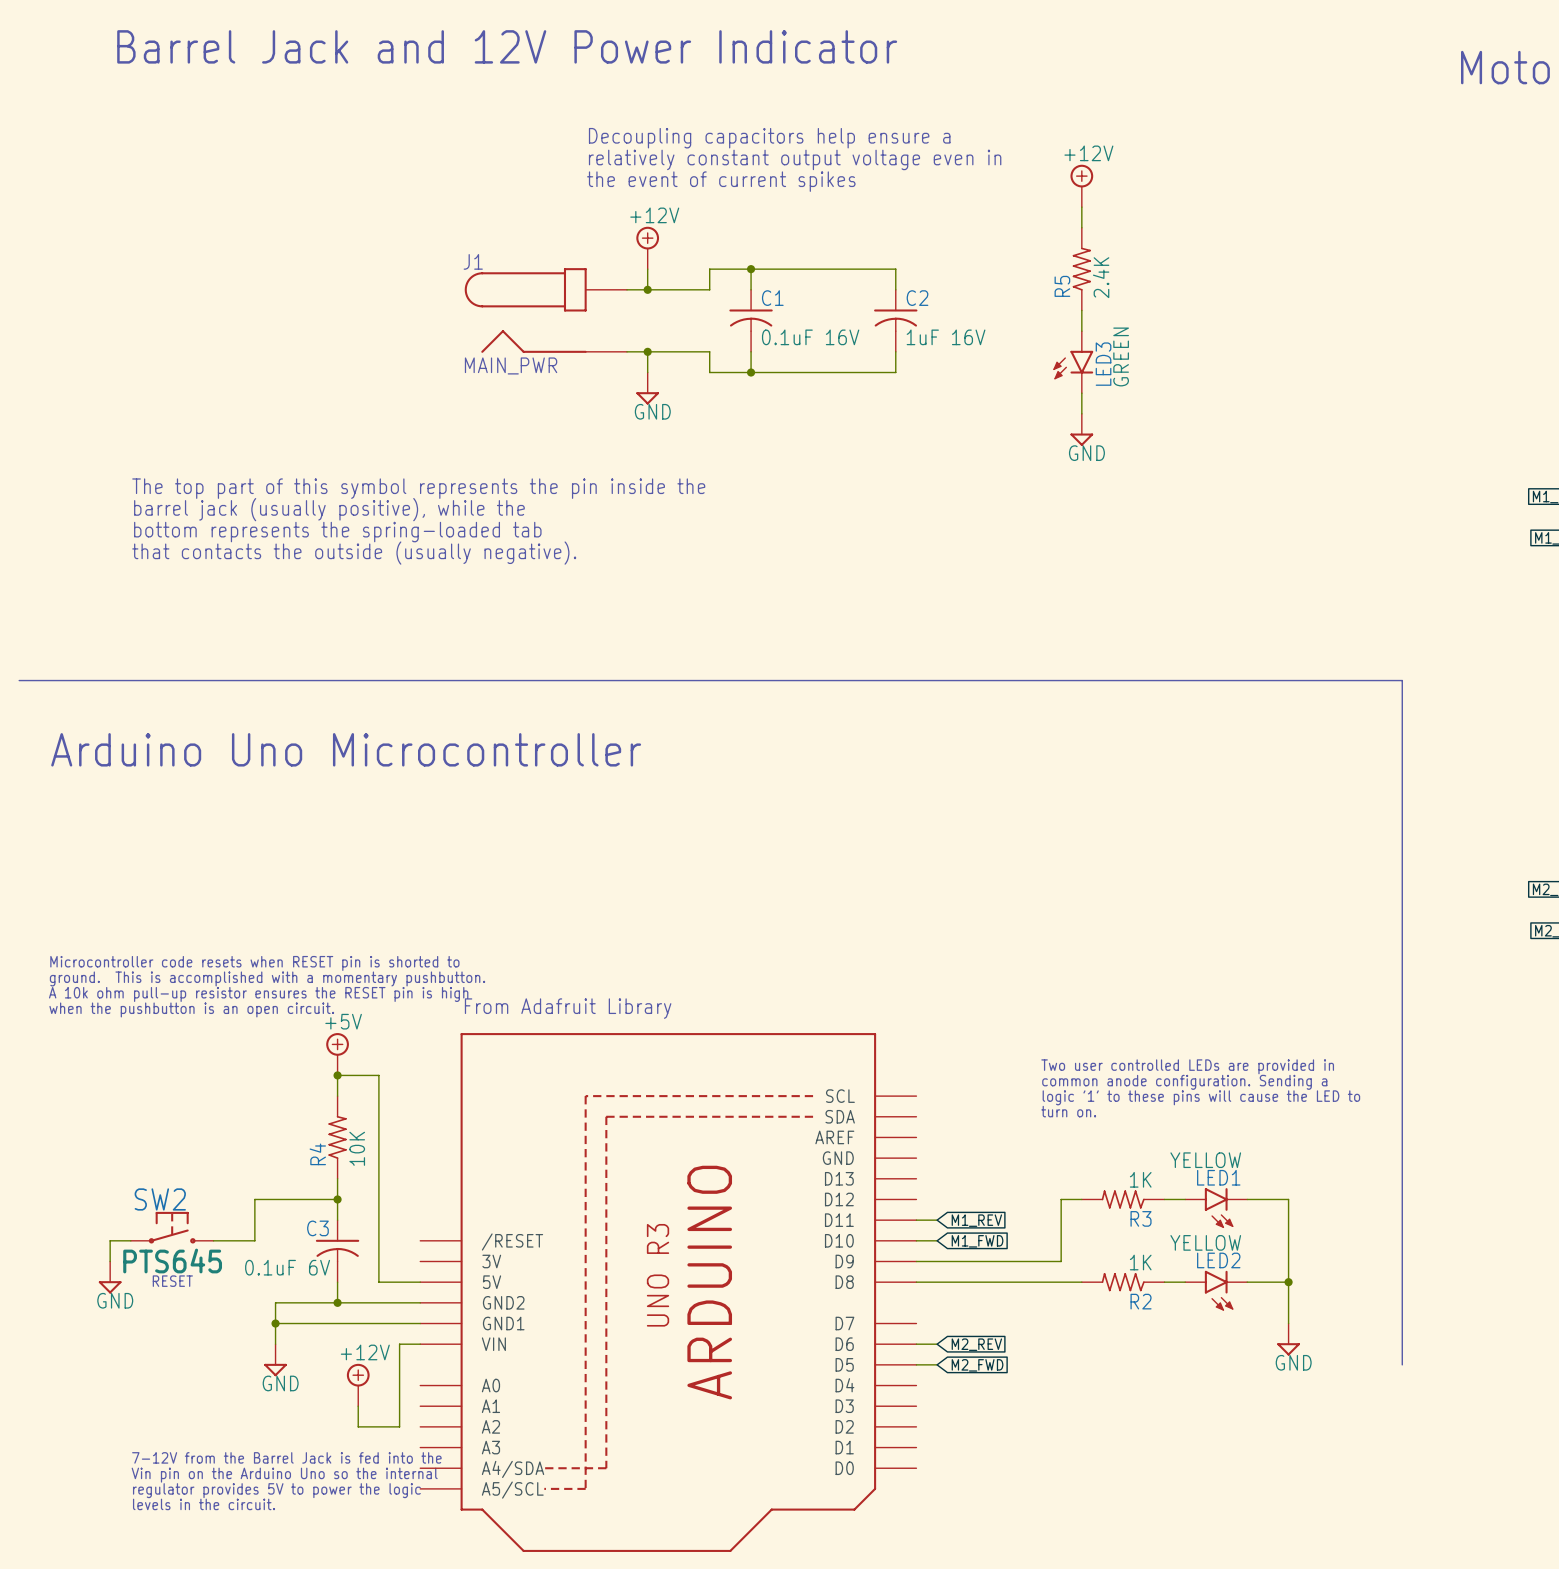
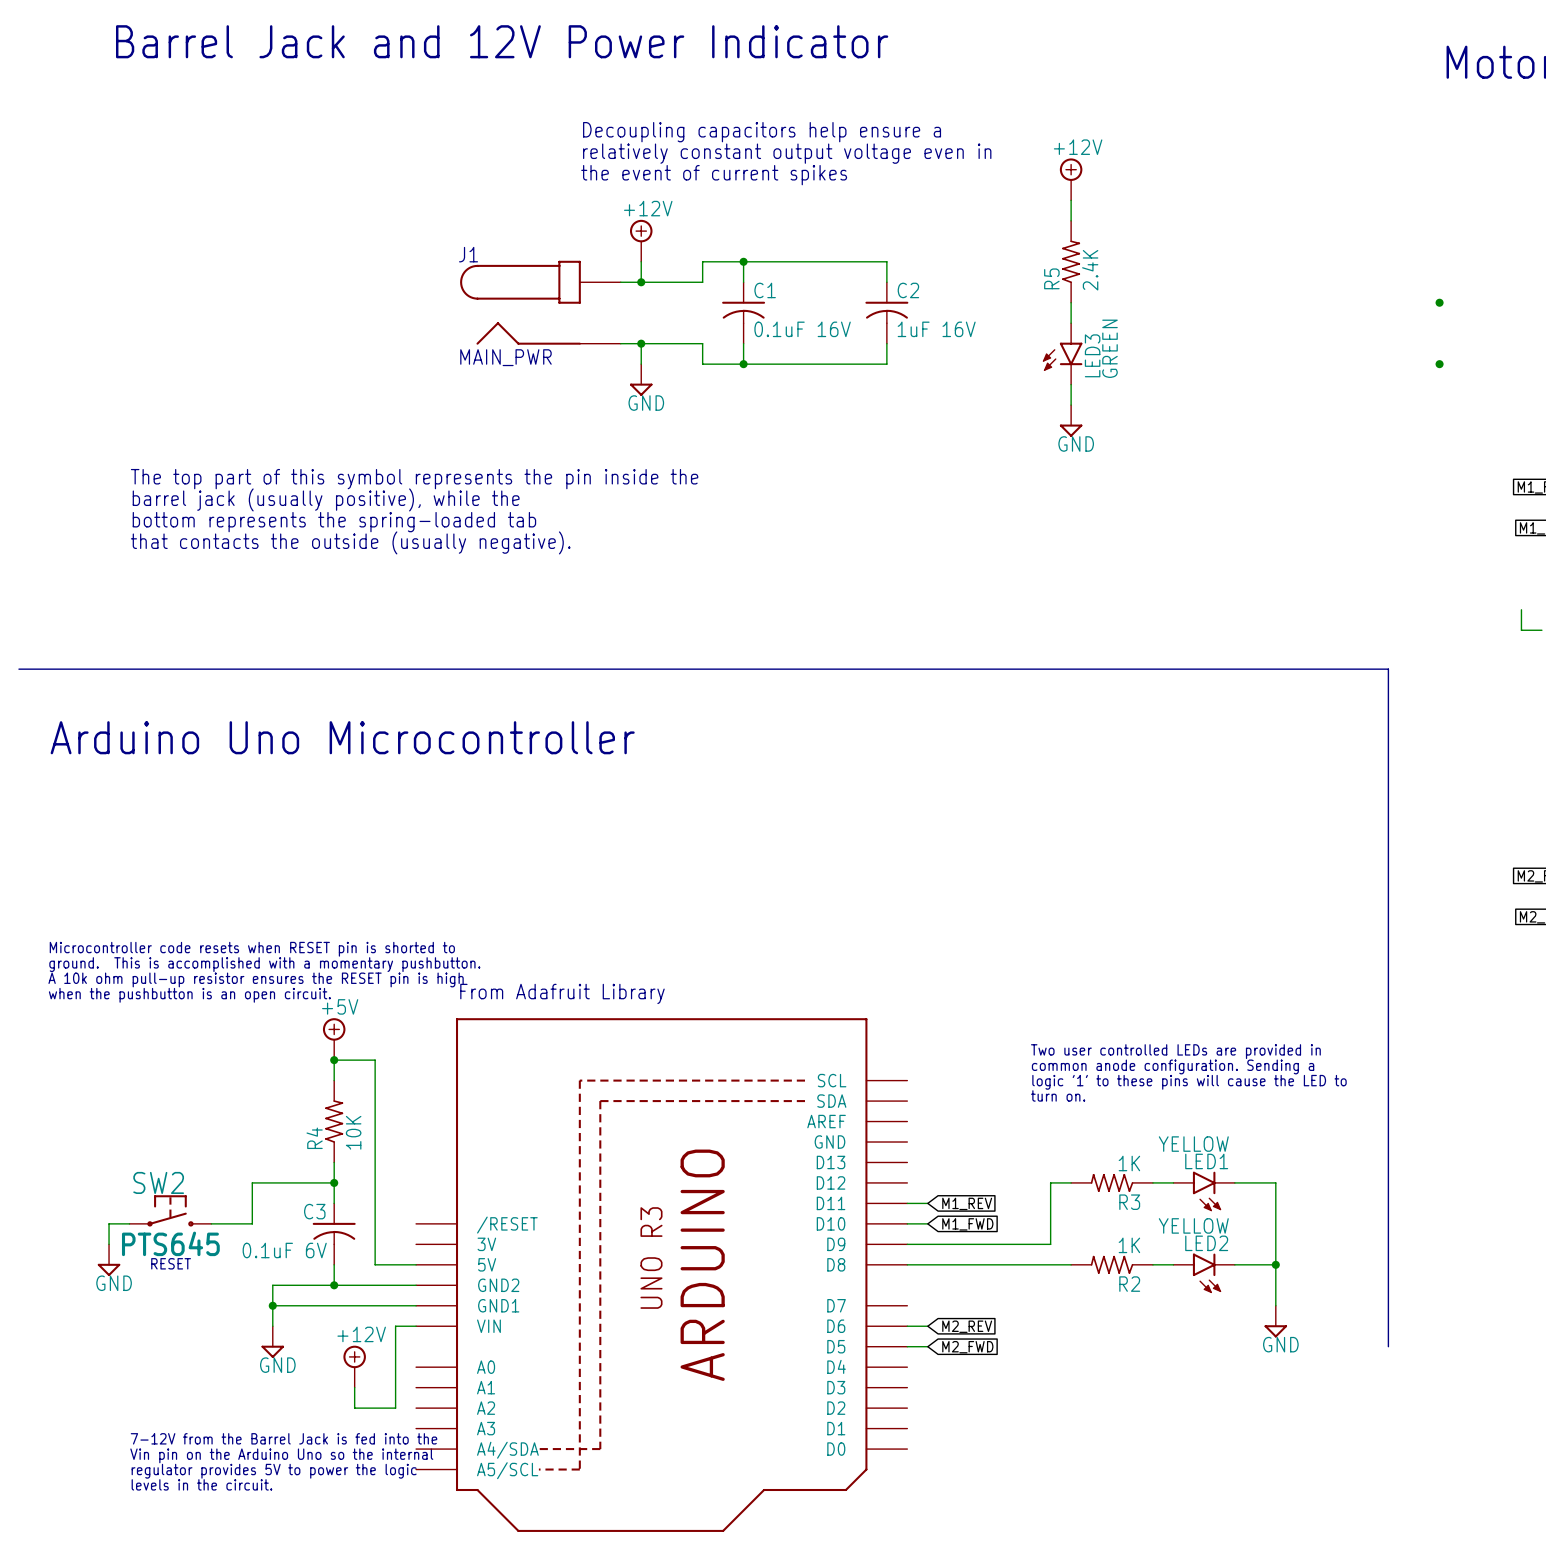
junction: none -> (1439, 302)
junction: none -> (1439, 364)
wire: none -> (1521, 609) (1521, 630) (1541, 630)

